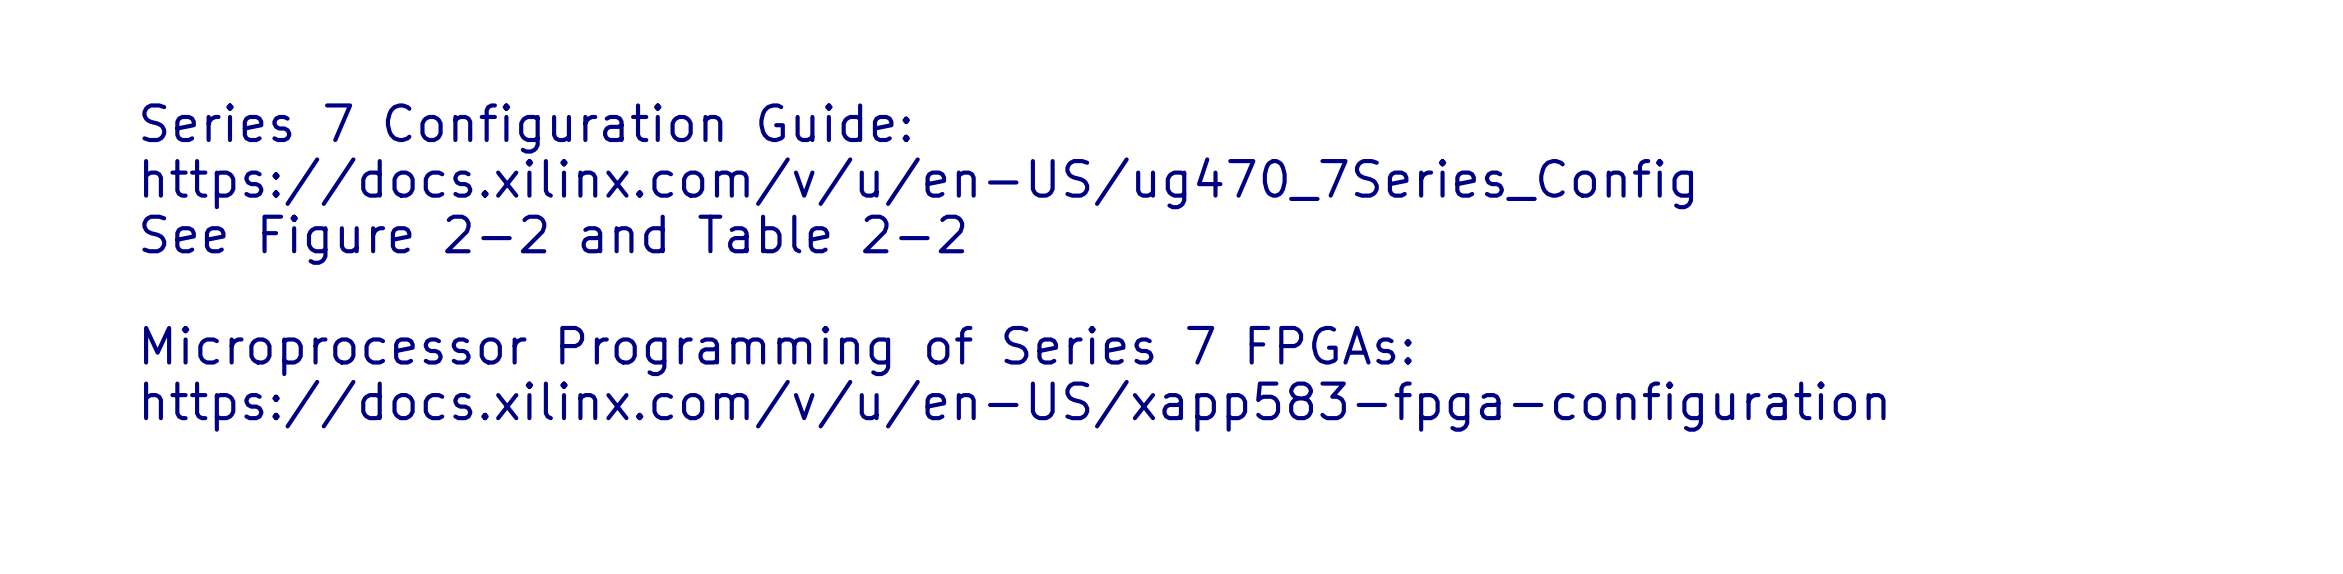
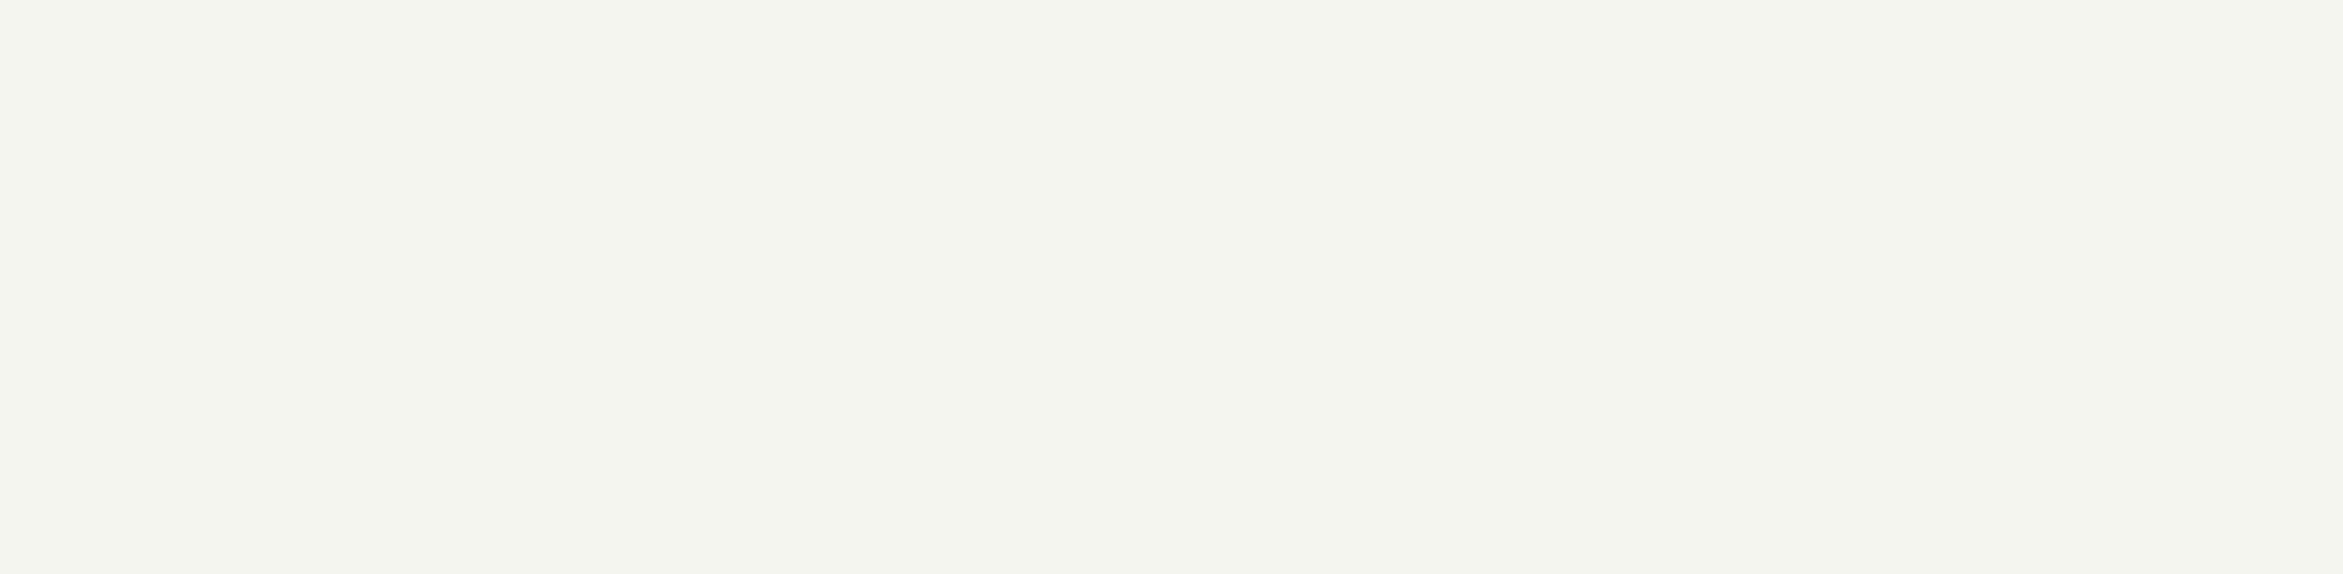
text: Series 7 Configuration Guide: (526, 128) -> none
text: https://docs.xilinx.com/v/u/en-US/ug470_7Series_Config (918, 183) -> none
text: See Figure 2-2 and Table 2-2 (553, 239) -> none
text: Microprocessor Programming of Series 7 FPGAs: (777, 350) -> none
text: https://docs.xilinx.com/v/u/en-US/xapp583-fpga-configuration (1014, 405) -> none

